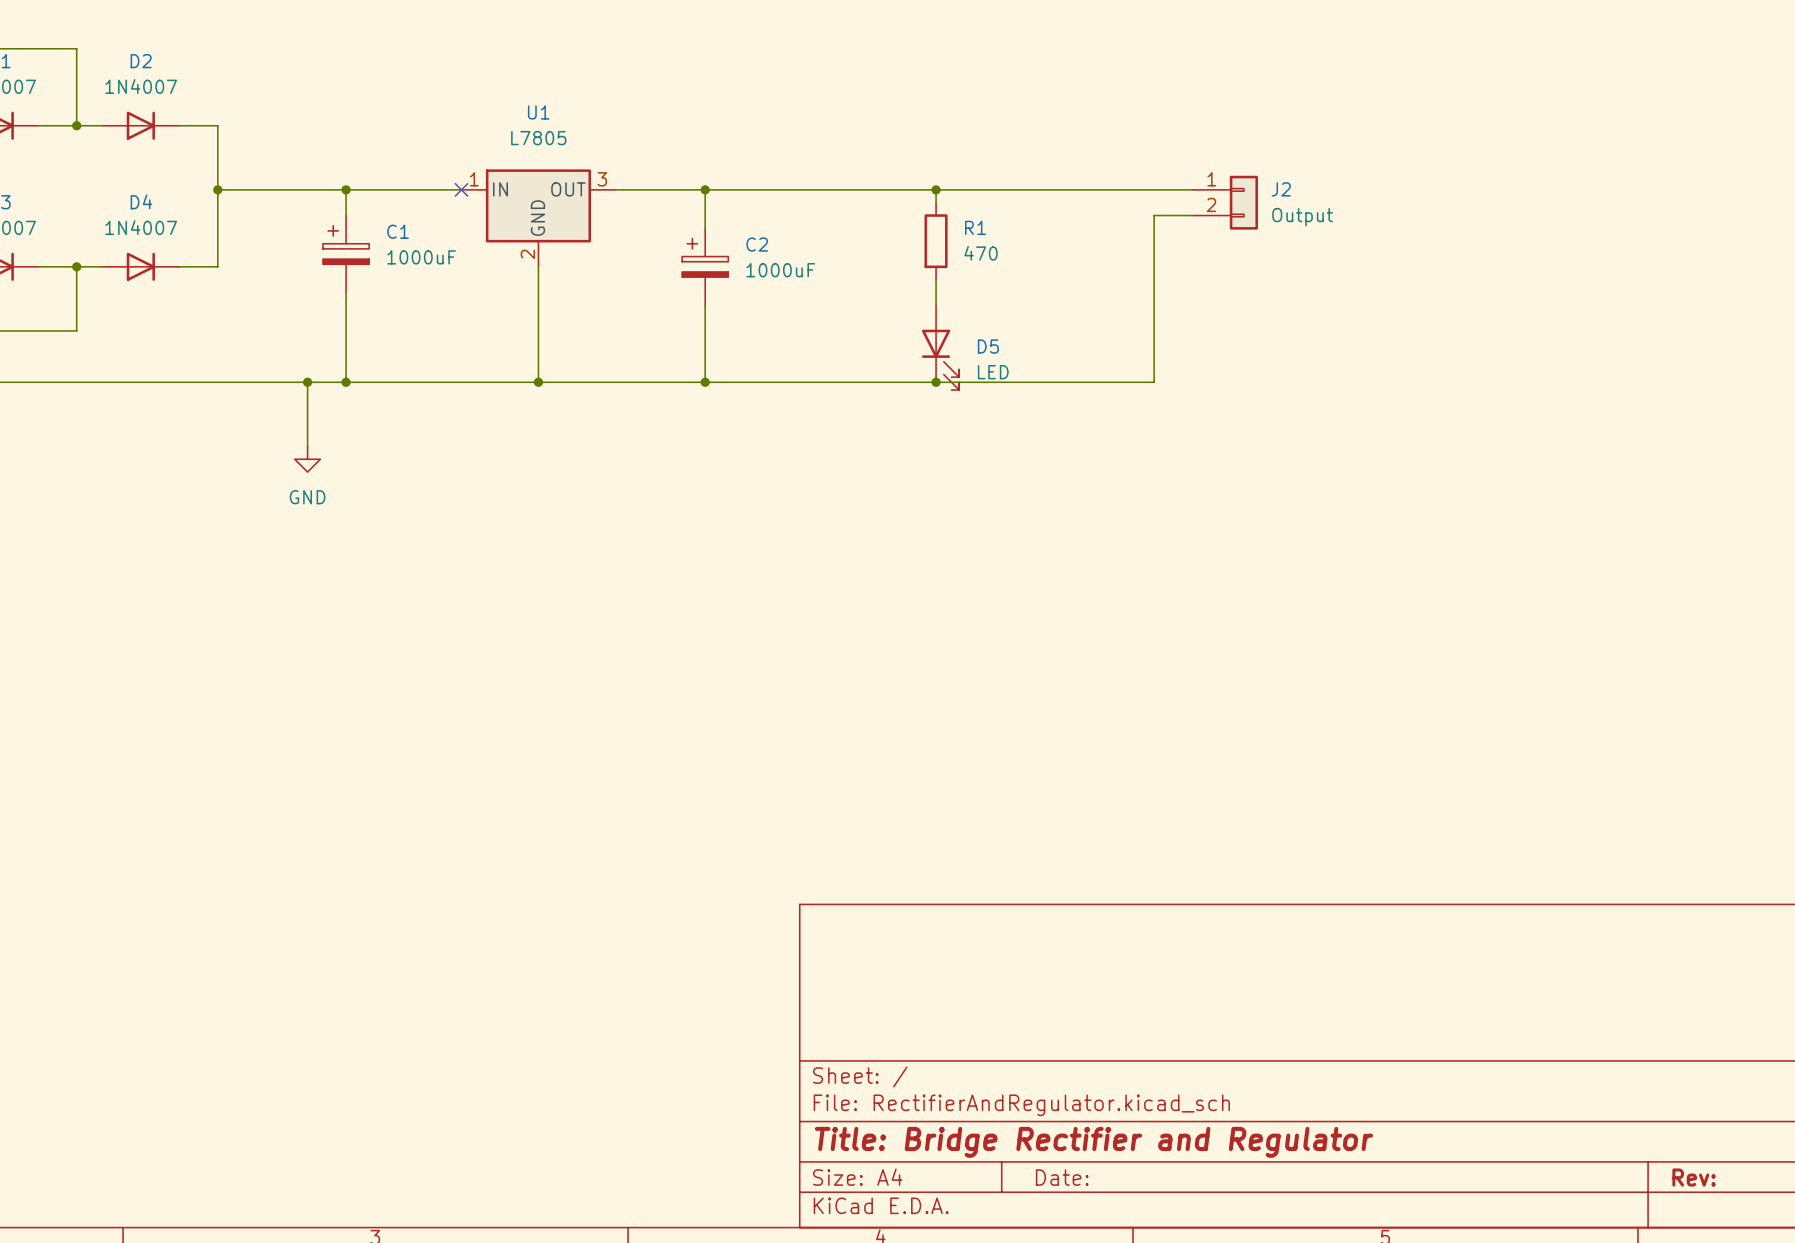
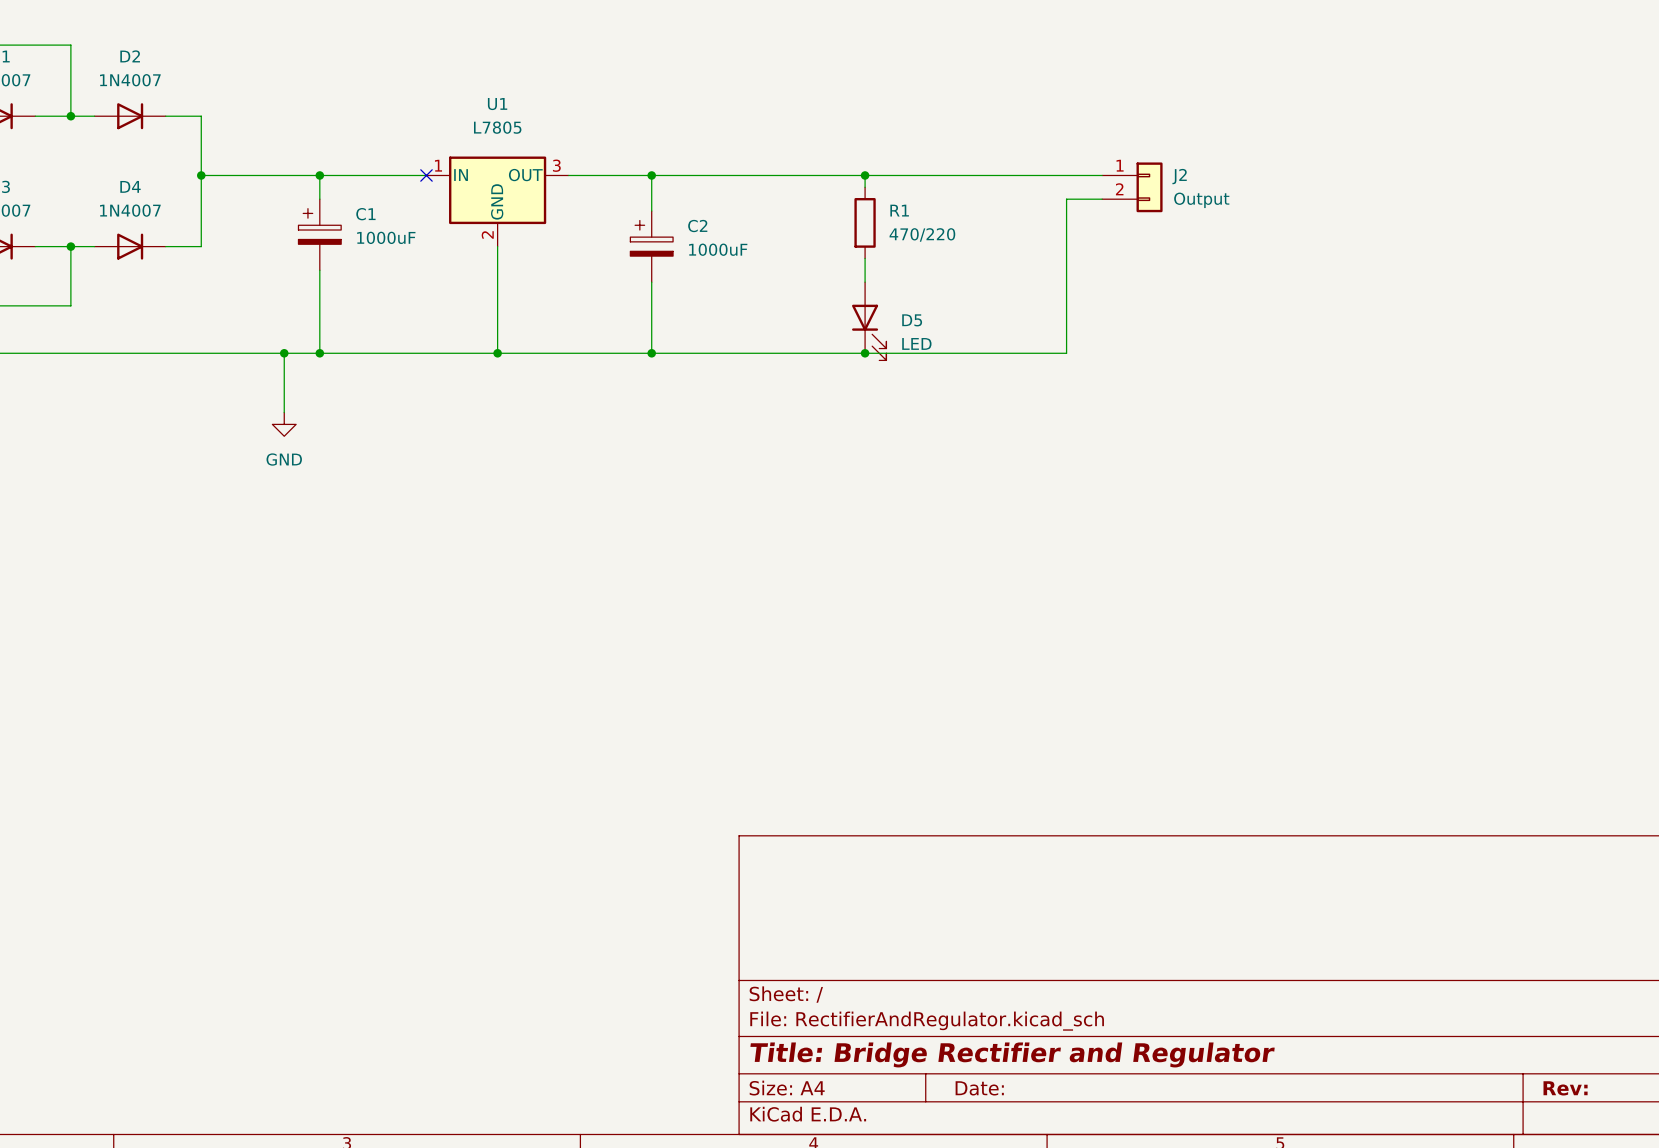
R1 value: 470 (981, 253) -> 470/220 (922, 234)

